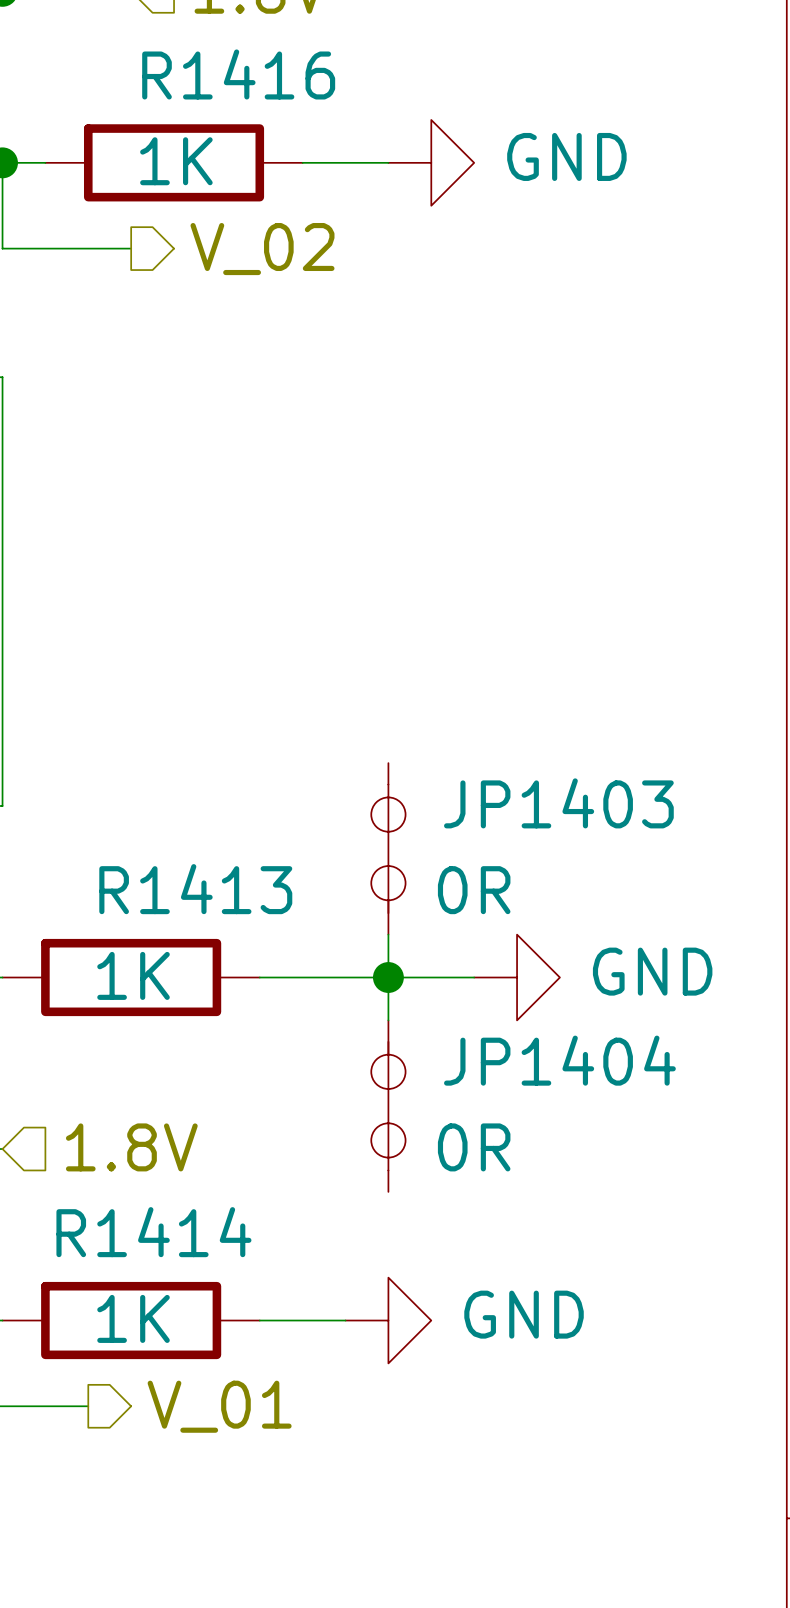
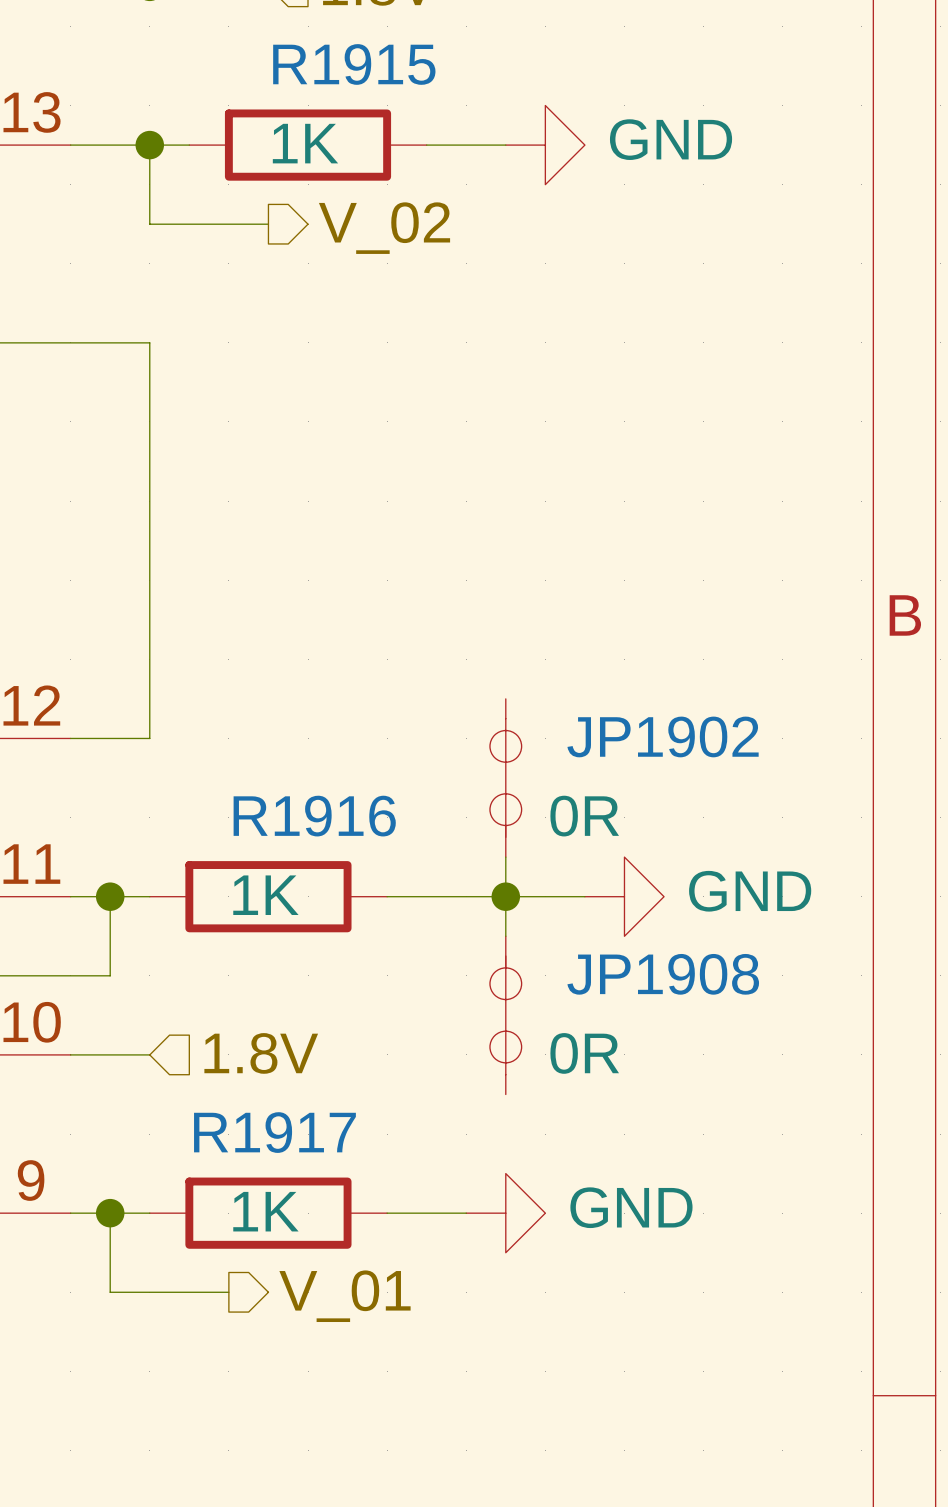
R1416 name: R1416 (238, 74) -> R1915 (354, 64)
JP1403 name: JP1403 (558, 803) -> JP1902 (663, 736)
R1413 name: R1413 (195, 889) -> R1916 (314, 816)
JP1404 name: JP1404 (559, 1060) -> JP1908 (663, 974)
R1414 name: R1414 (153, 1232) -> R1917 (274, 1132)

